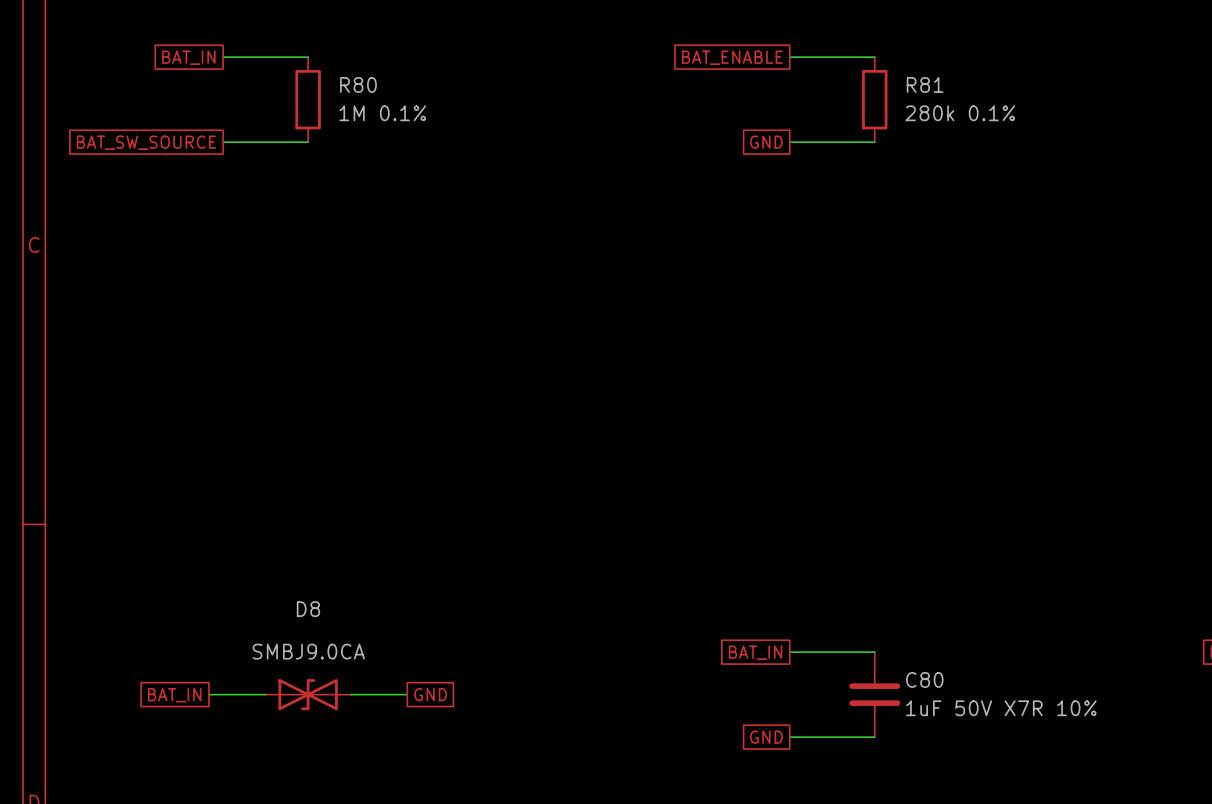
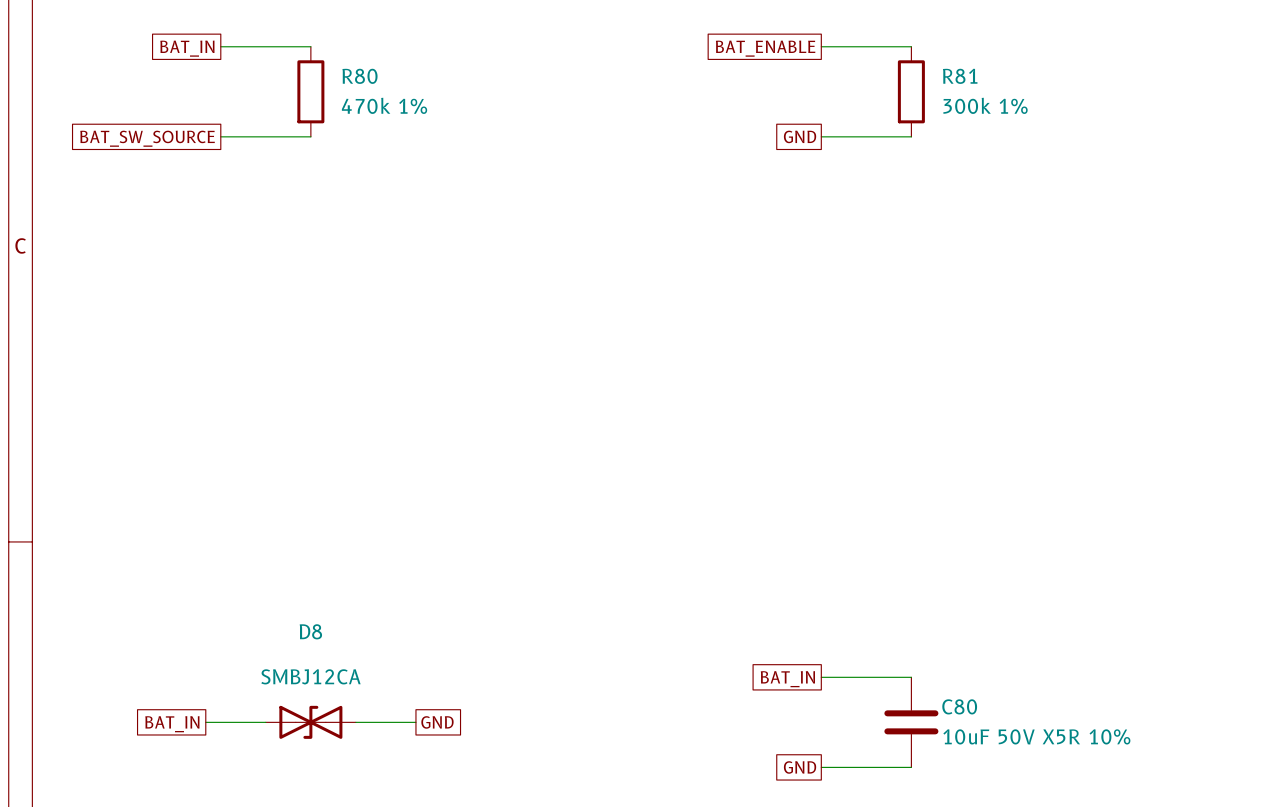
R80 value: 1M 0.1% (382, 113) -> 470k 1% (384, 105)
R81 value: 280k 0.1% (960, 113) -> 300k 1% (985, 105)
D8 value: SMBJ9.0CA (308, 651) -> SMBJ12CA (310, 676)
C80 value: 1uF 50V X7R 10% (1001, 708) -> 10uF 50V X5R 10% (1036, 736)

